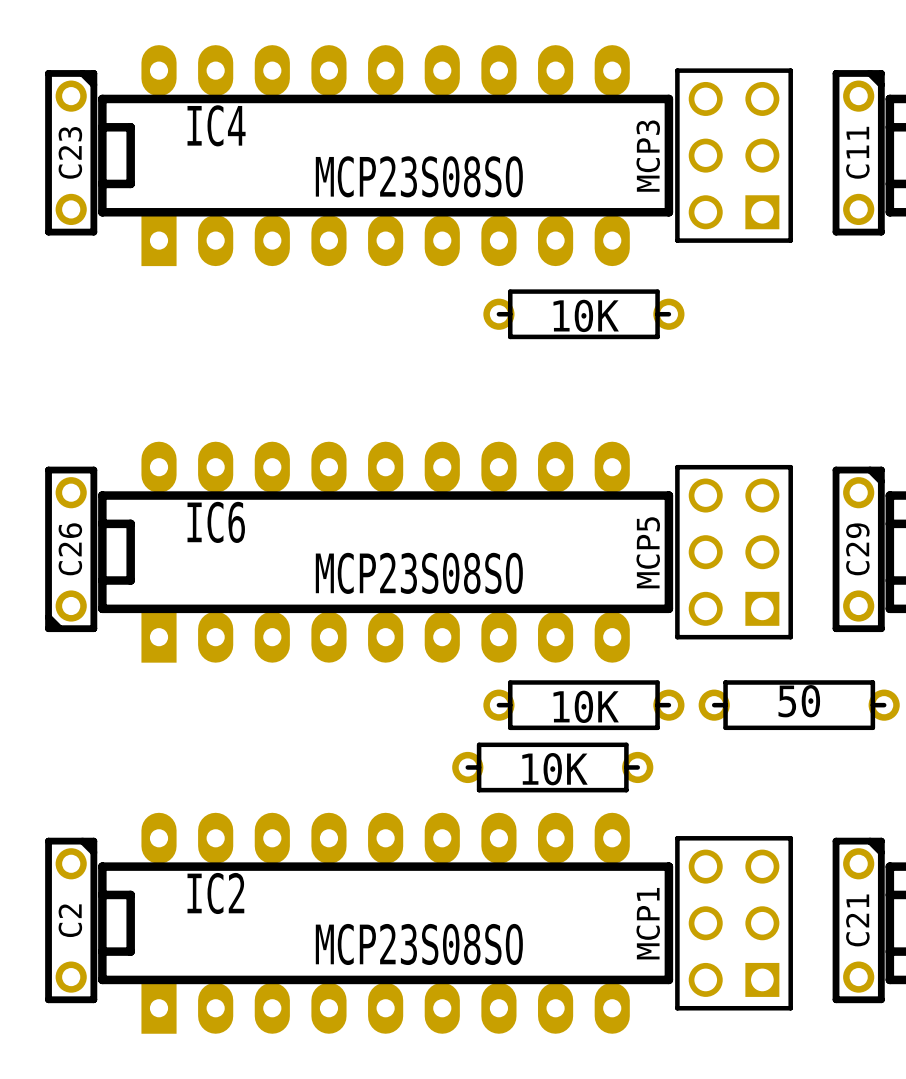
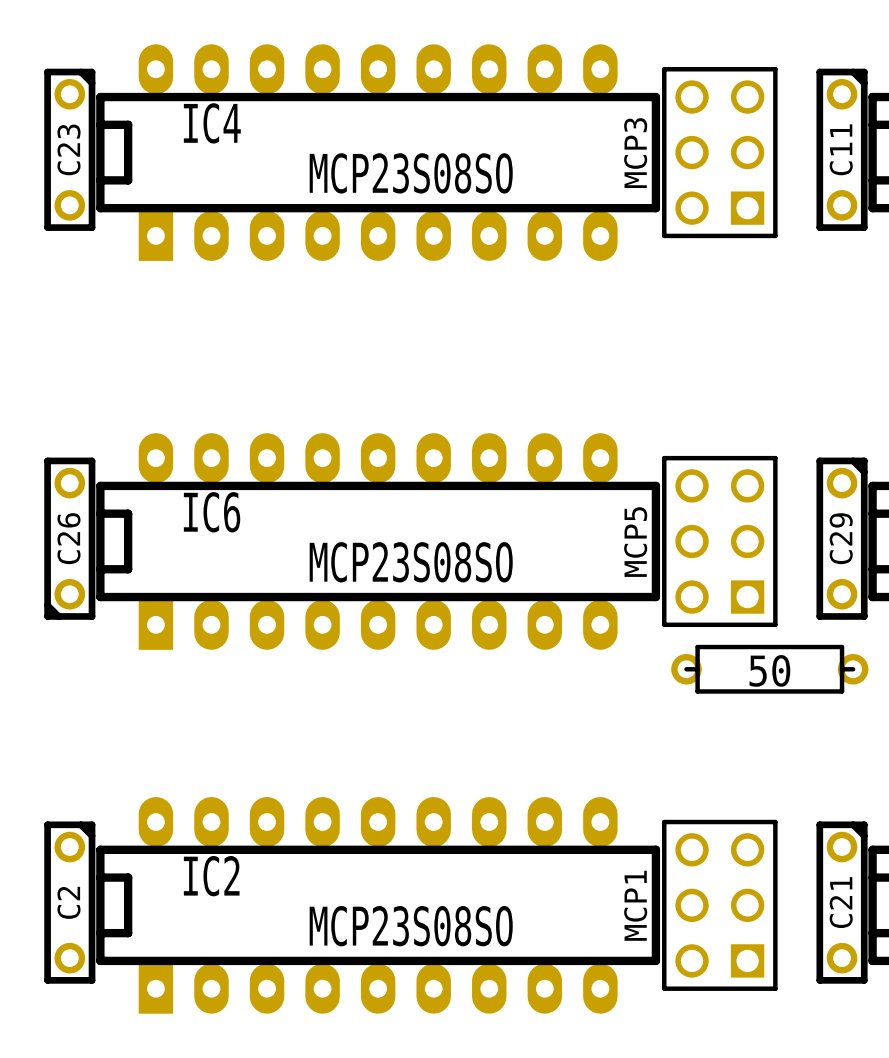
part: 10K (583, 314) -> none
part: 10K (583, 705) -> none
part rotation: 0° (799, 705) -> 180° (769, 669)
part: 10K (552, 767) -> none

